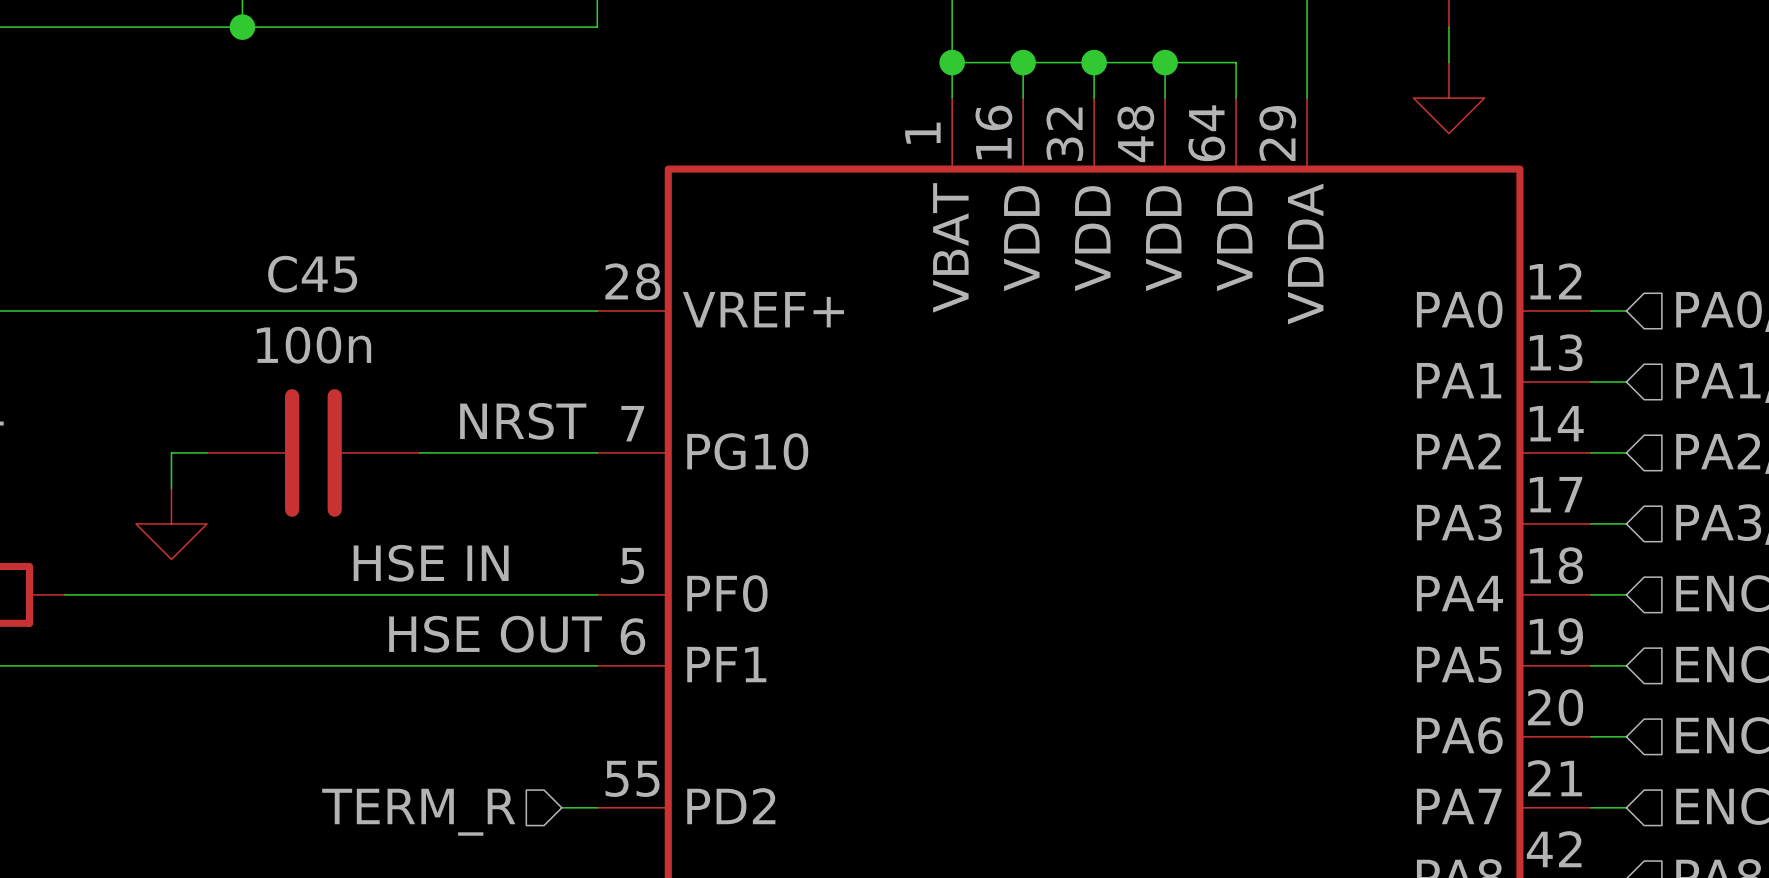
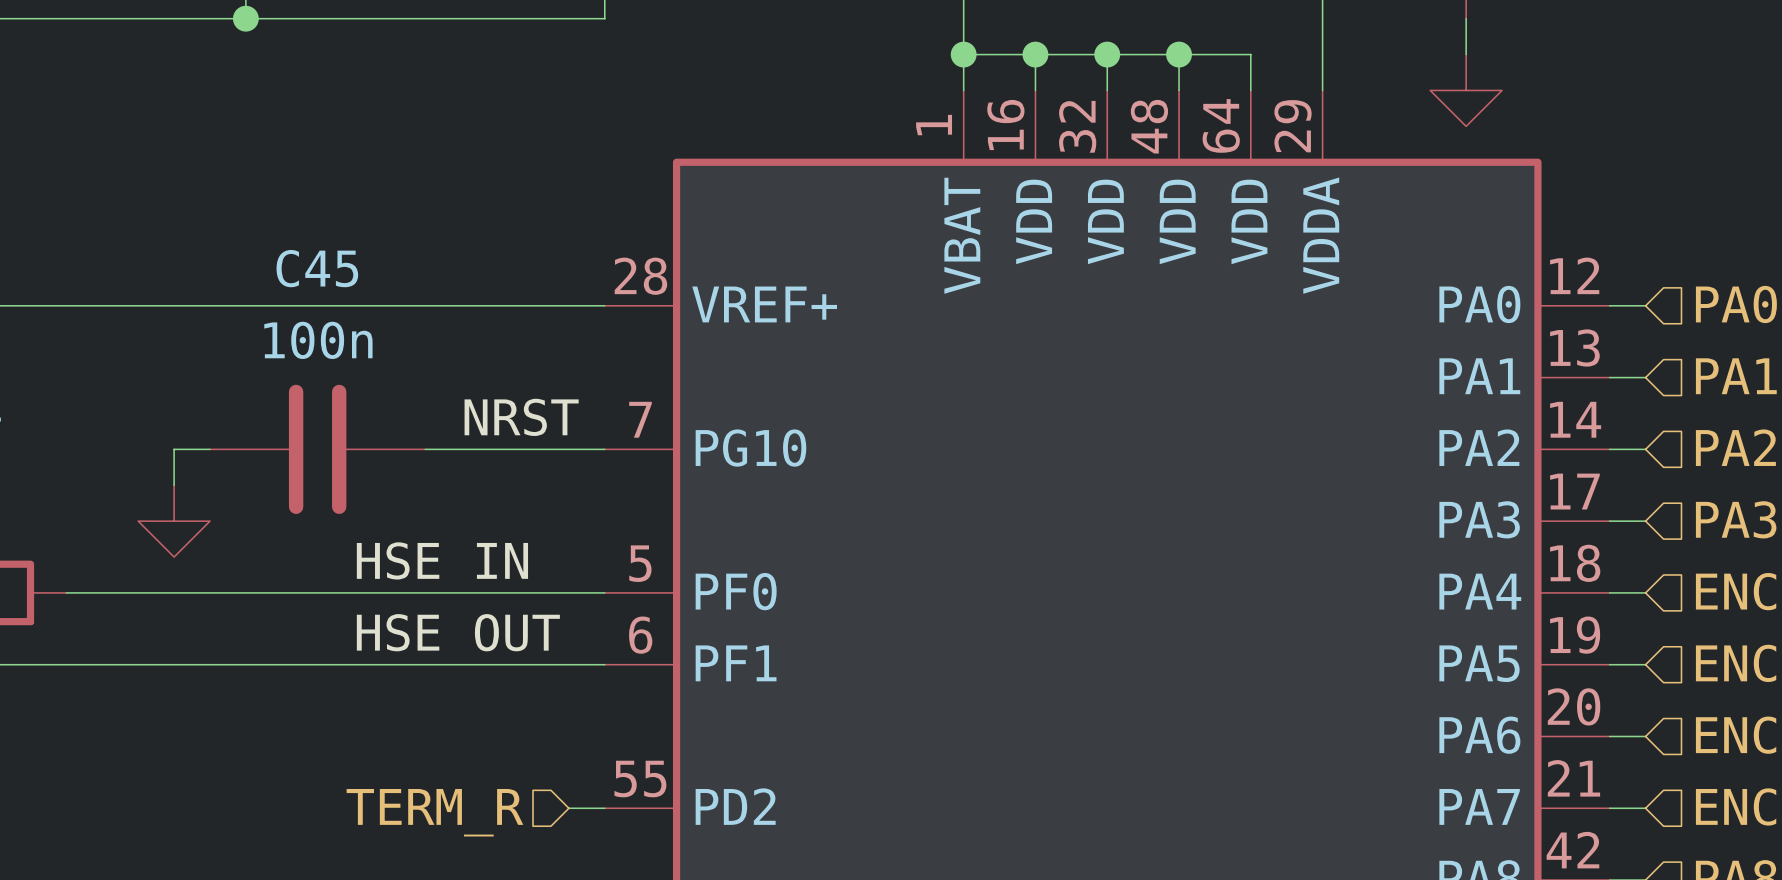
label position: HSE OUT (495, 634) -> HSE OUT (458, 632)

